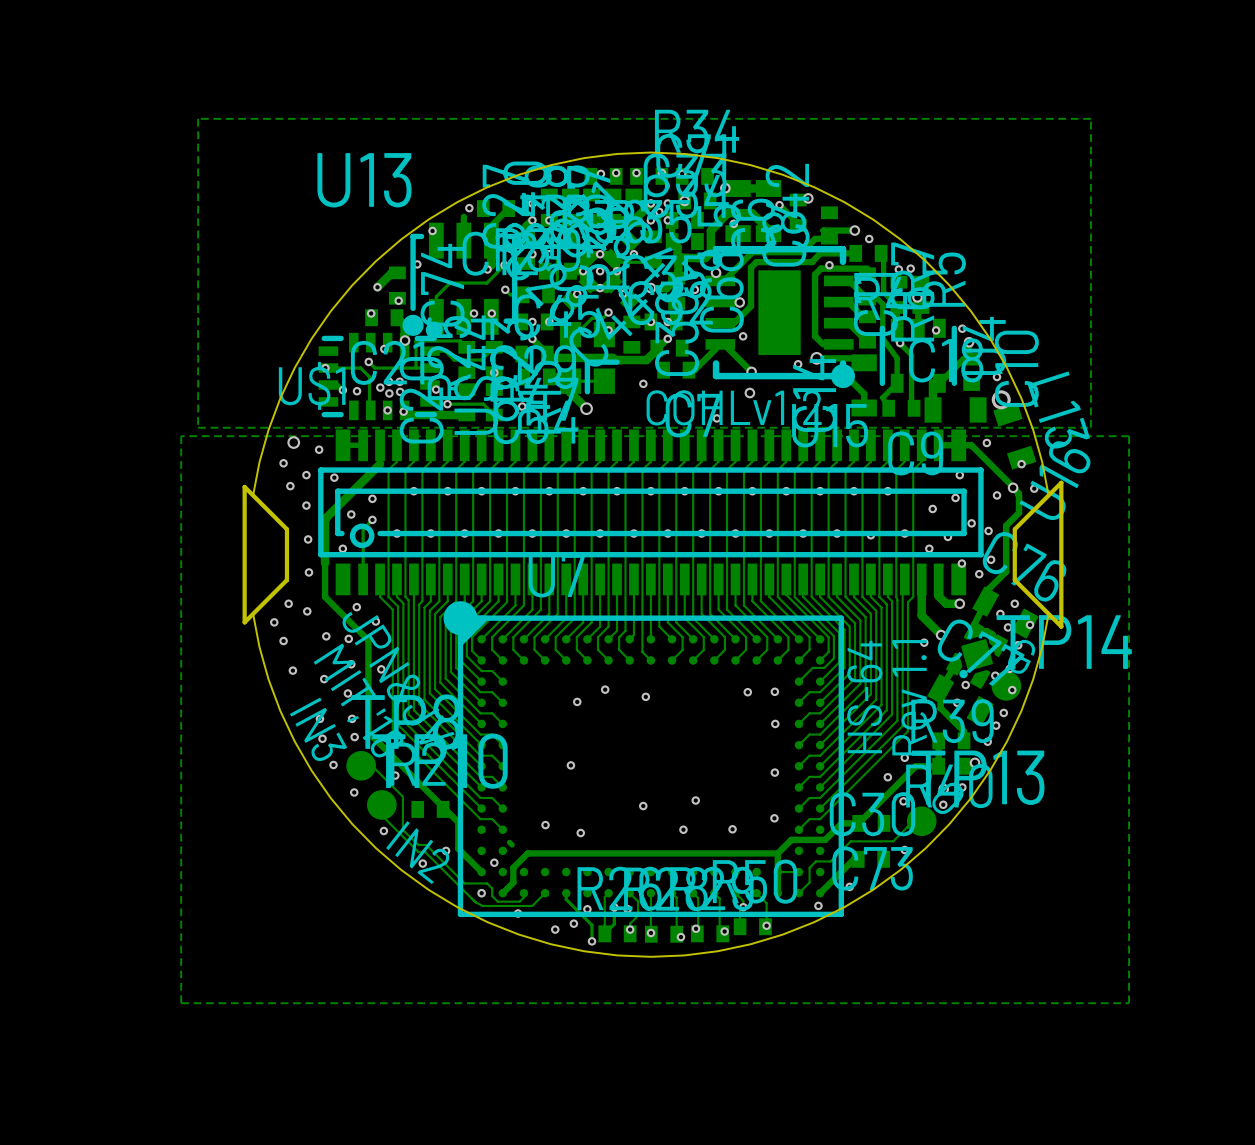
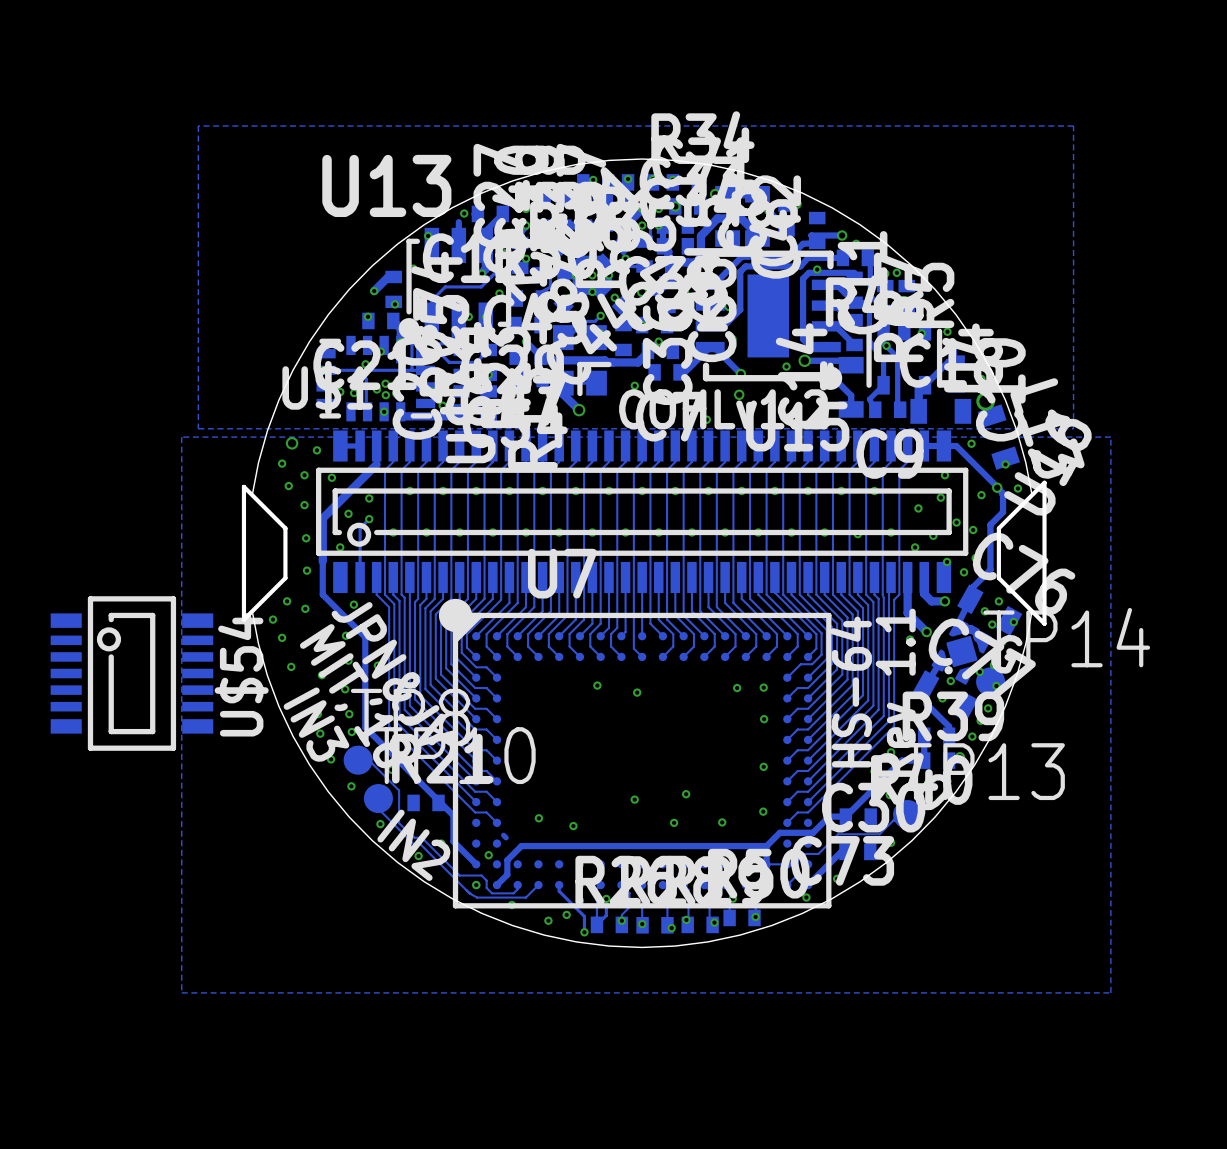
via: (375, 621) -> none
U$54: none -> (131, 673)
via: (577, 701) -> none
via: (570, 765) -> none

